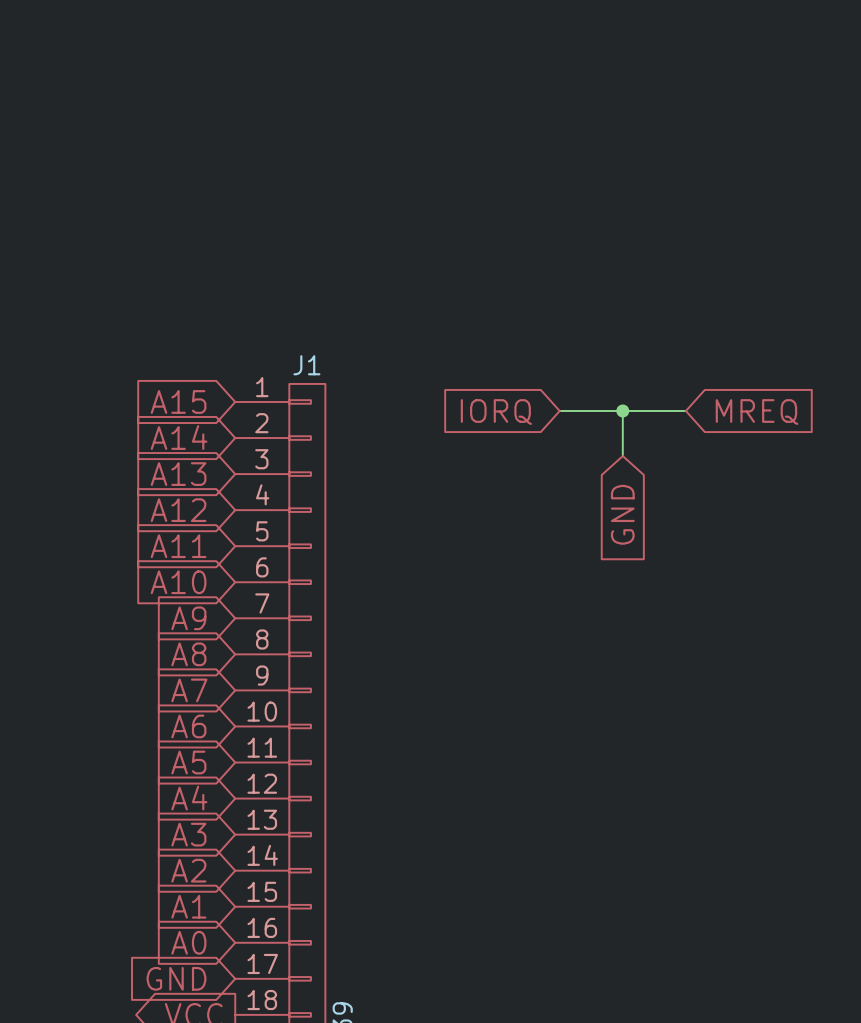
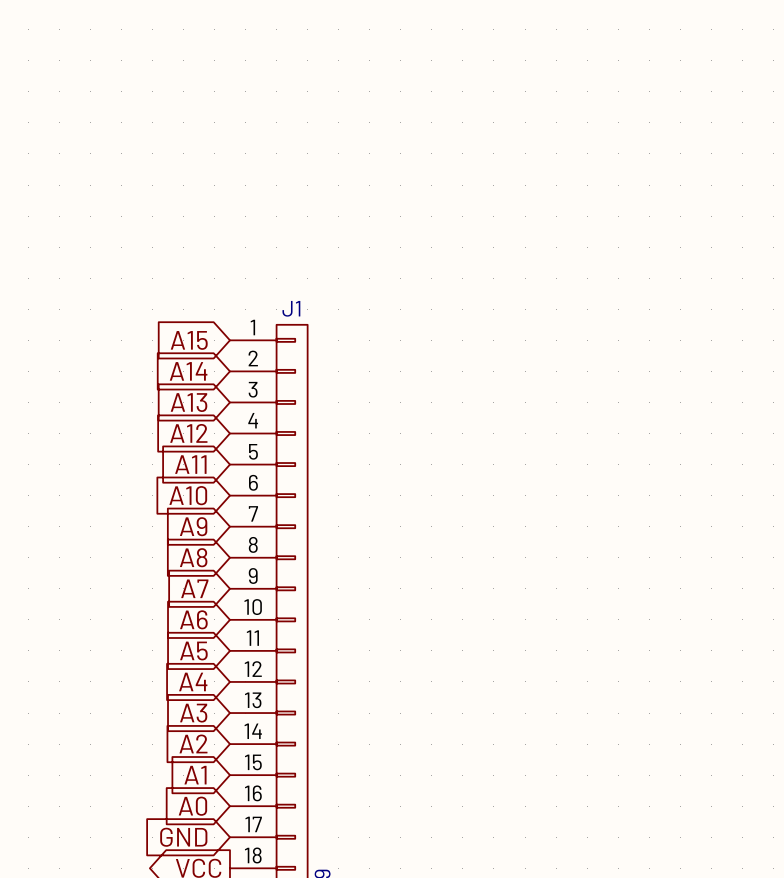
wire: (559, 410) (685, 410) -> none
wire: (622, 410) (622, 456) -> none
junction: (622, 410) -> none
global label: IORQ (496, 412) -> none
global label: MREQ (756, 412) -> none
global label: GND (622, 514) -> none

